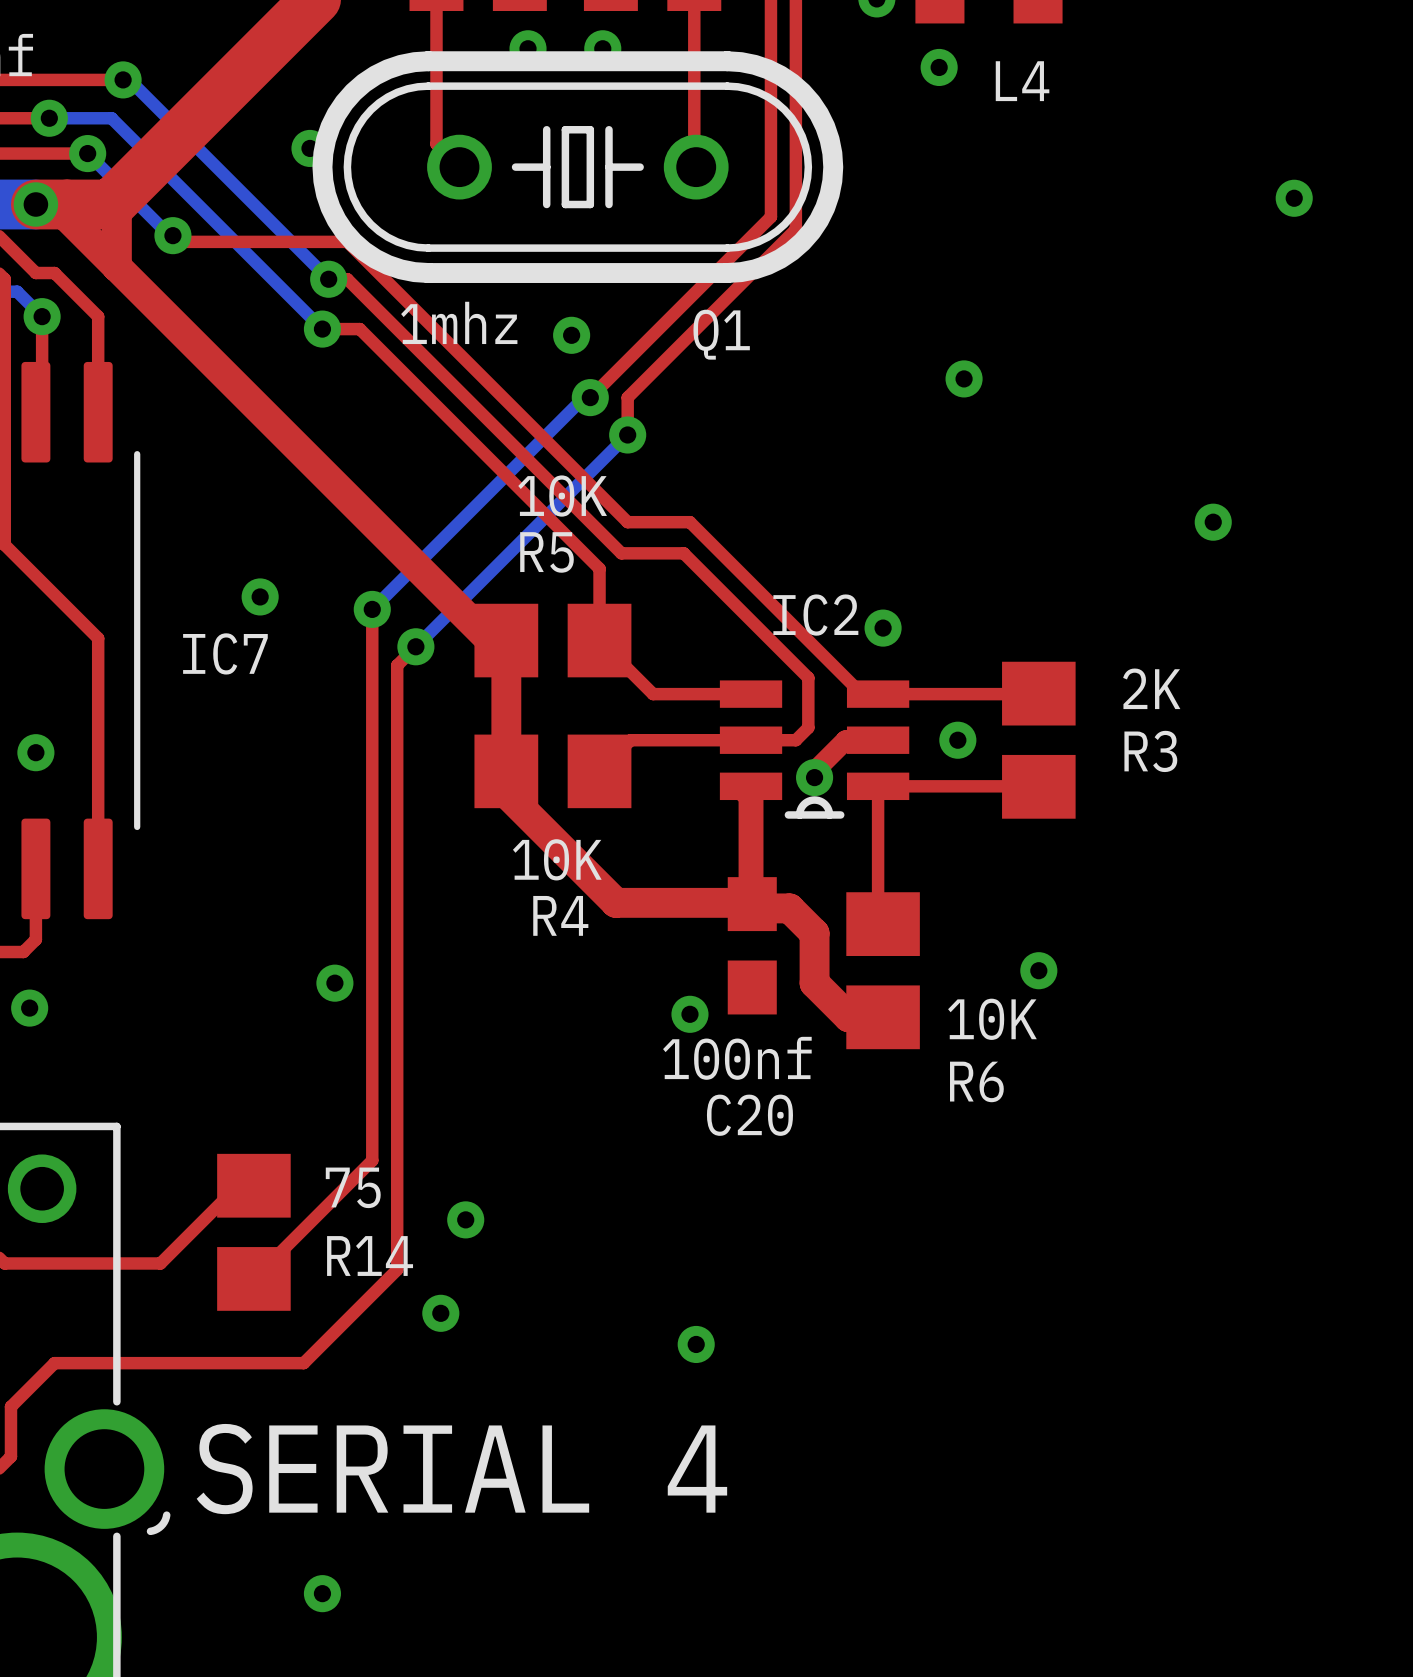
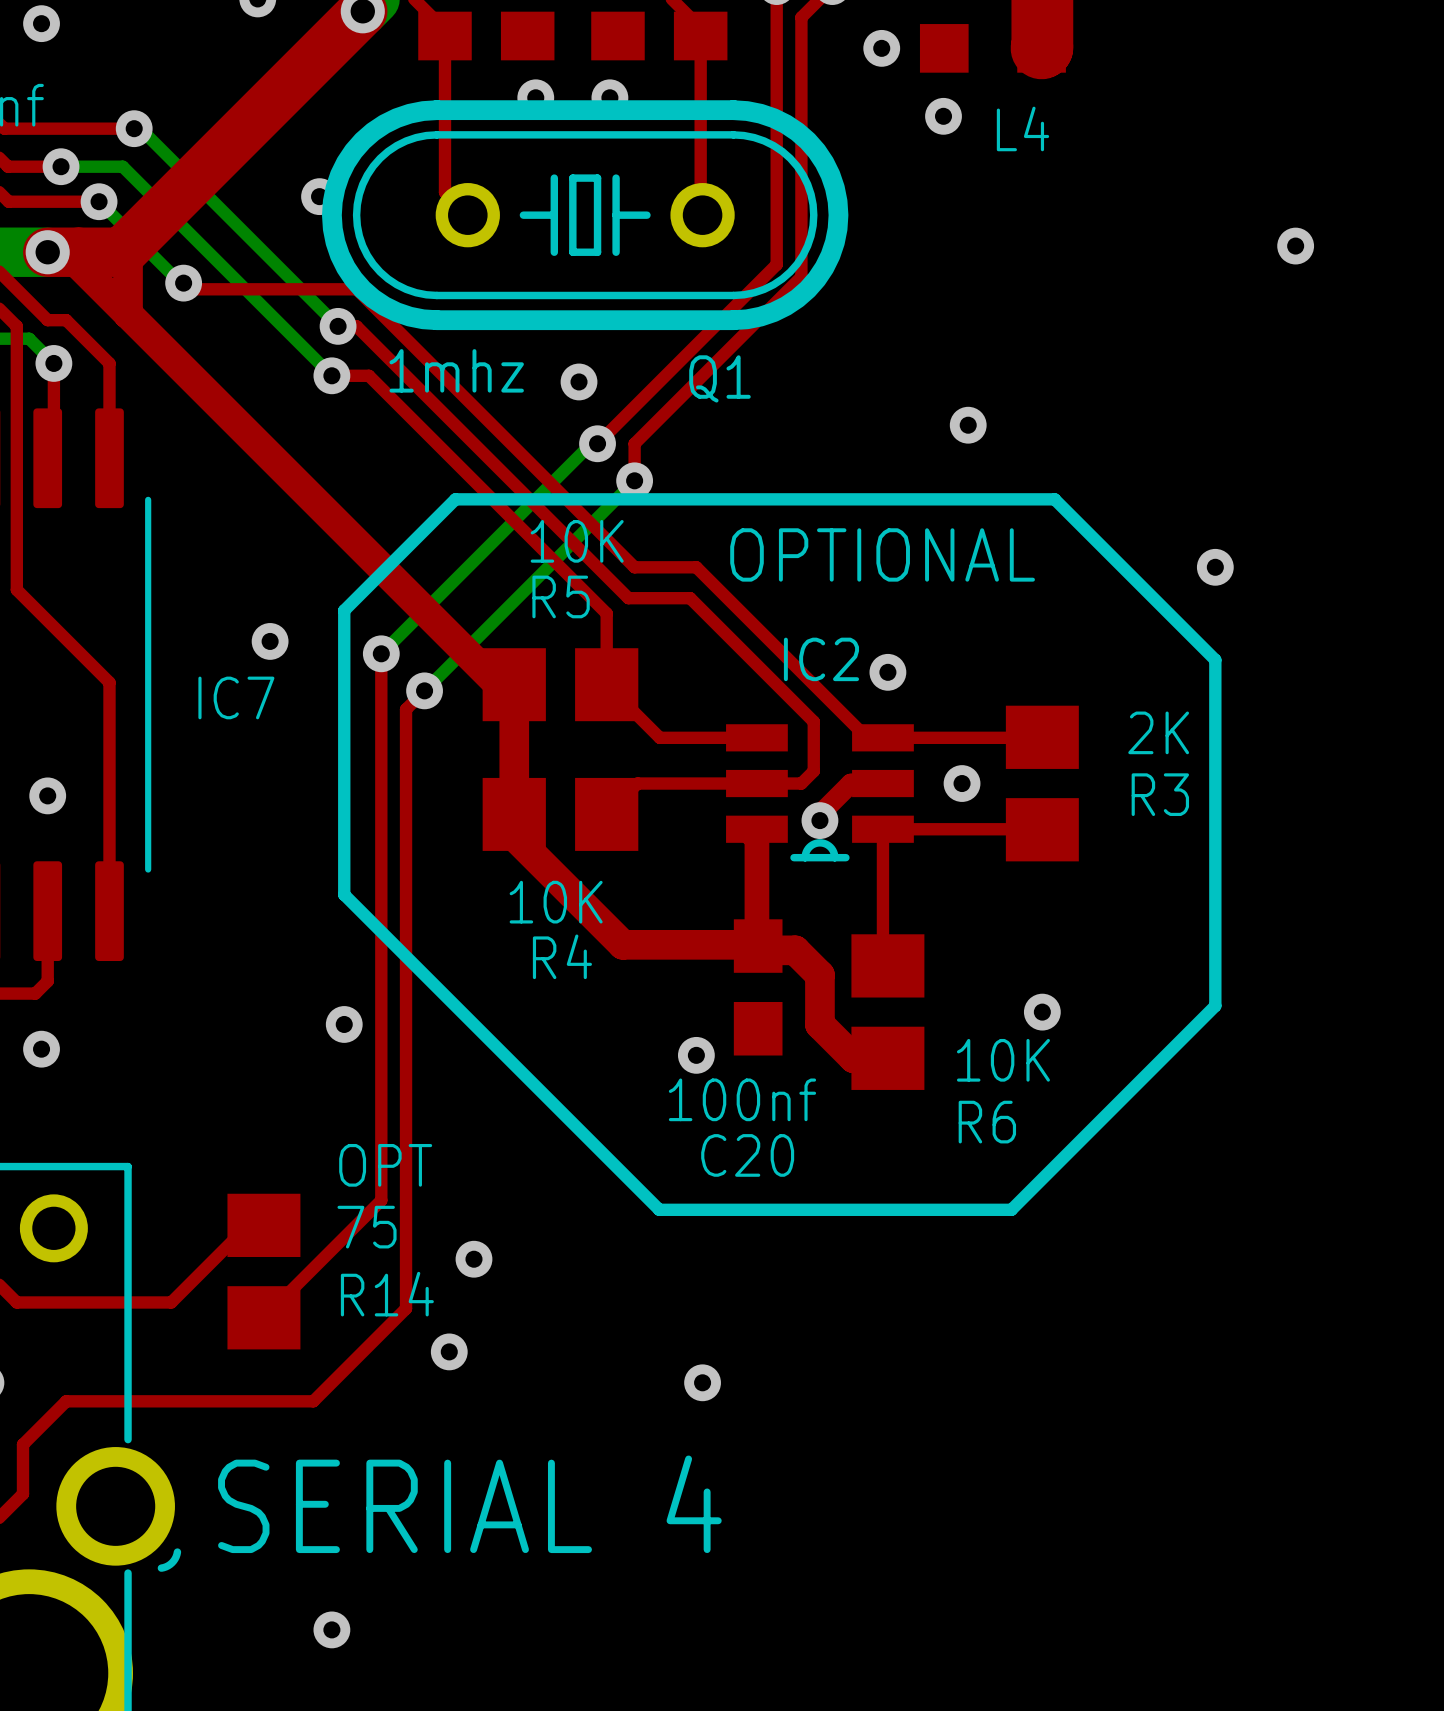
line: none -> (455, 499) (344, 610) (344, 894) (659, 1209) (1011, 1209) (1215, 1005) (1215, 659) (1054, 499) (455, 499)
text: none -> OPTIONAL (882, 554)
text: none -> OPT (385, 1165)

